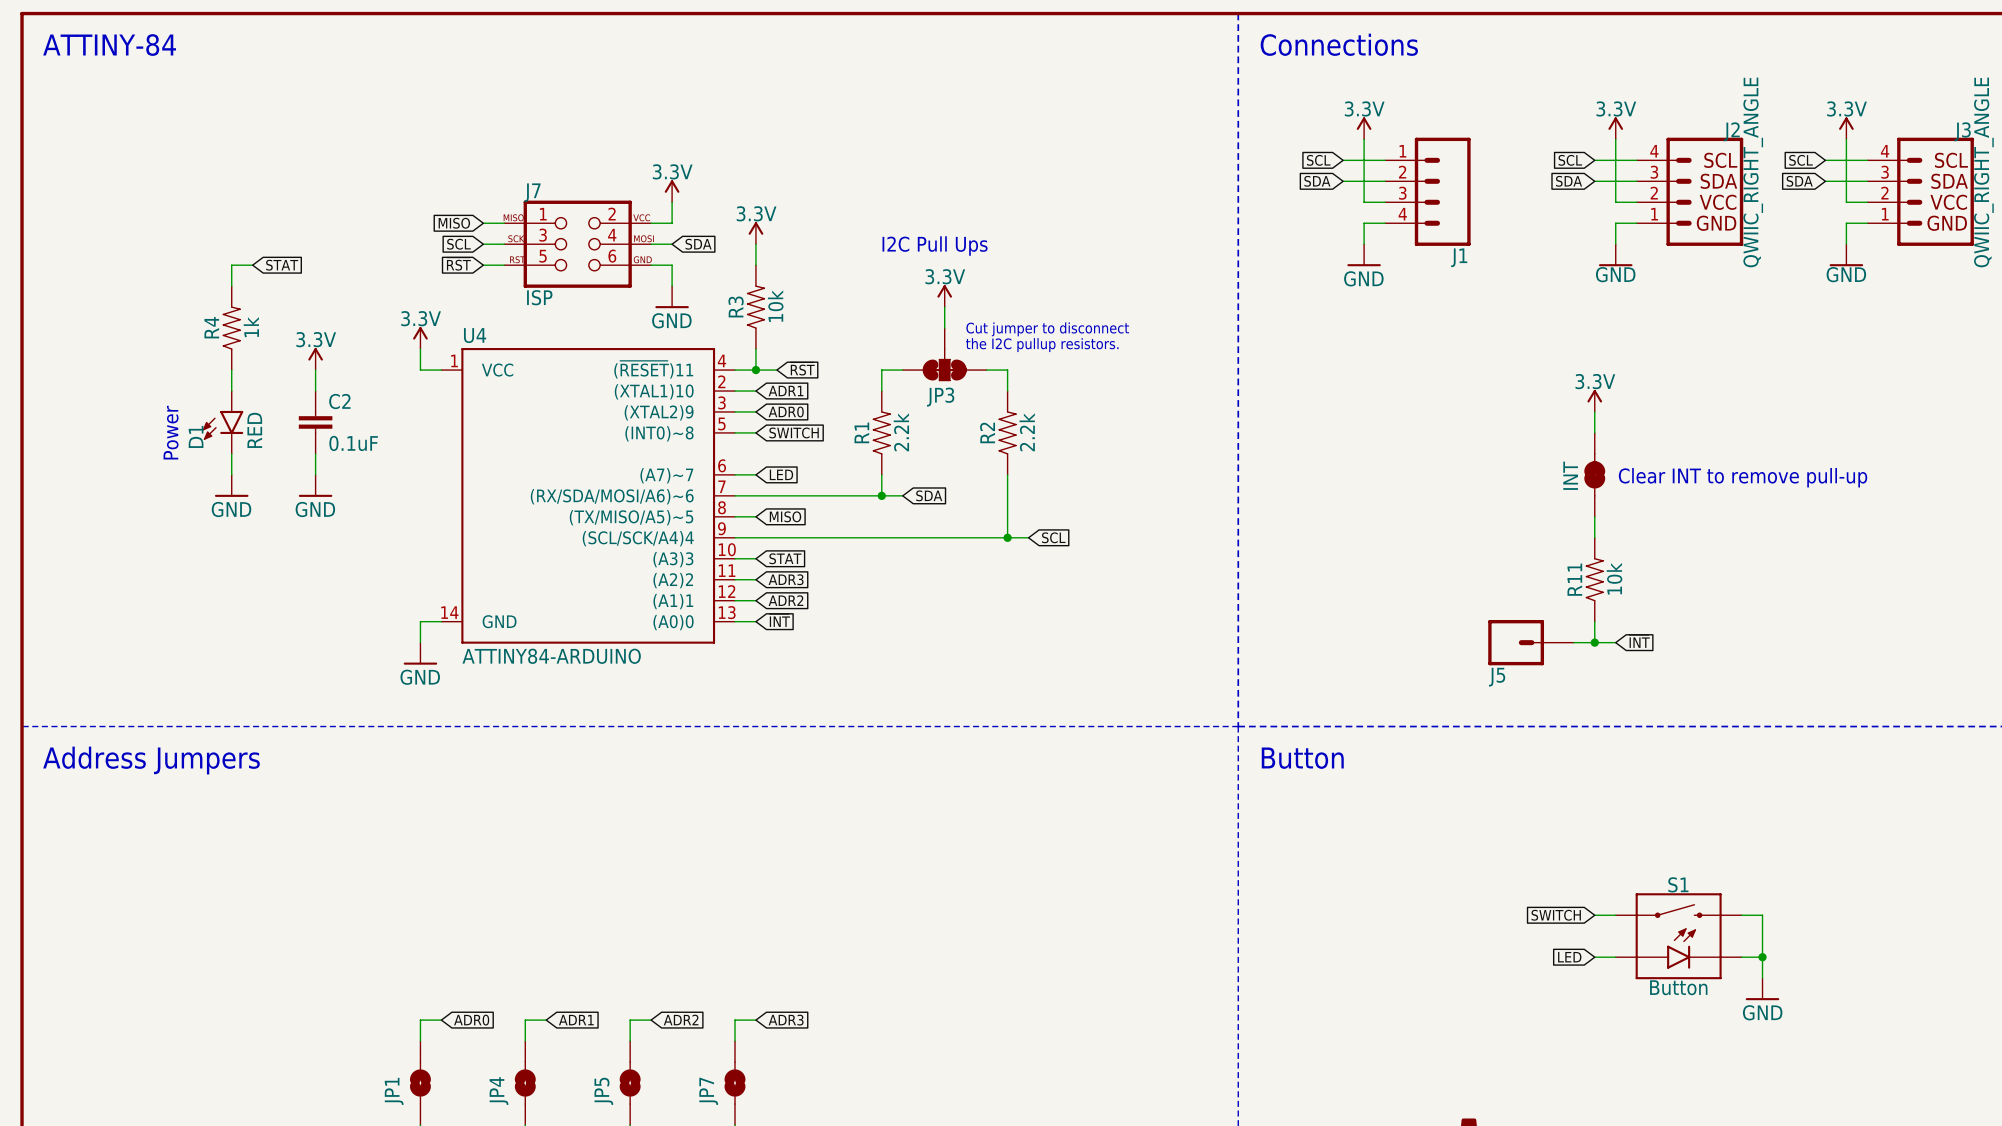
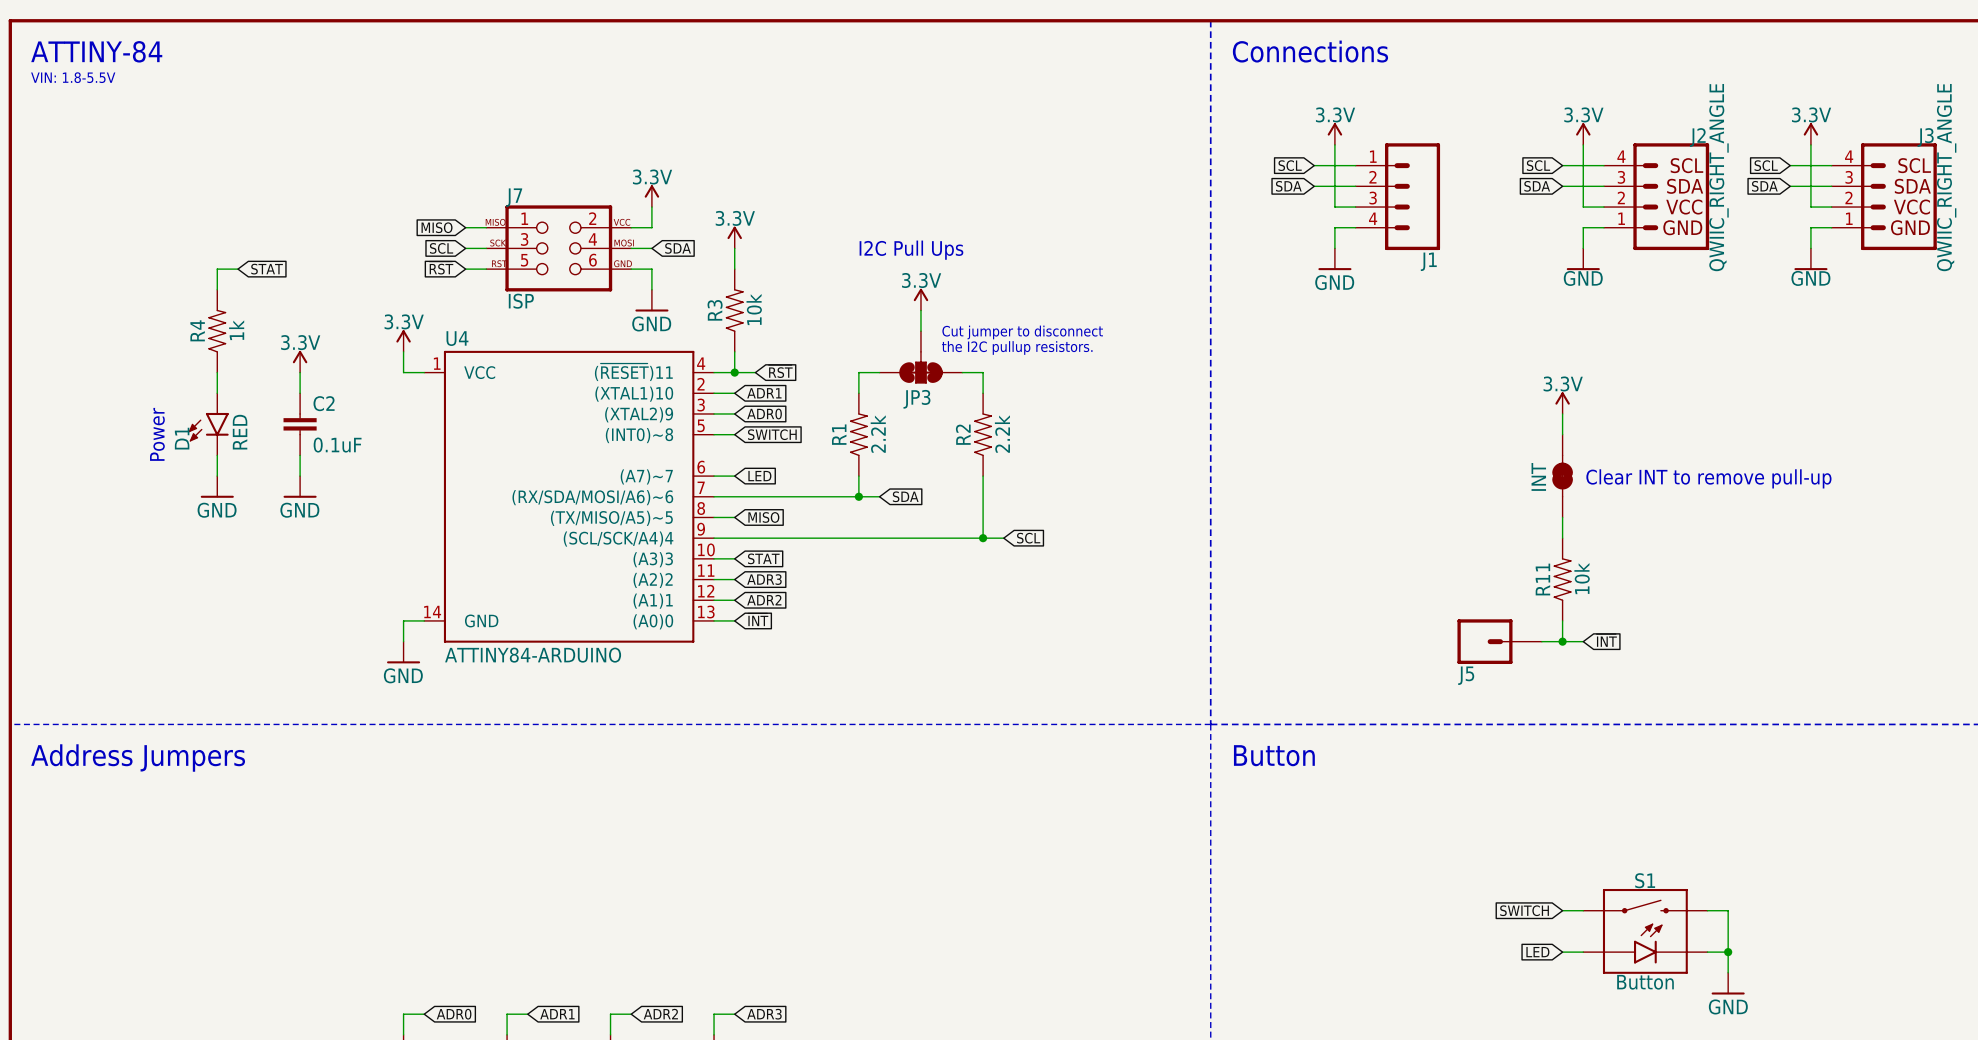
text: none -> VIN: 1.8-5.5V (73, 77)

